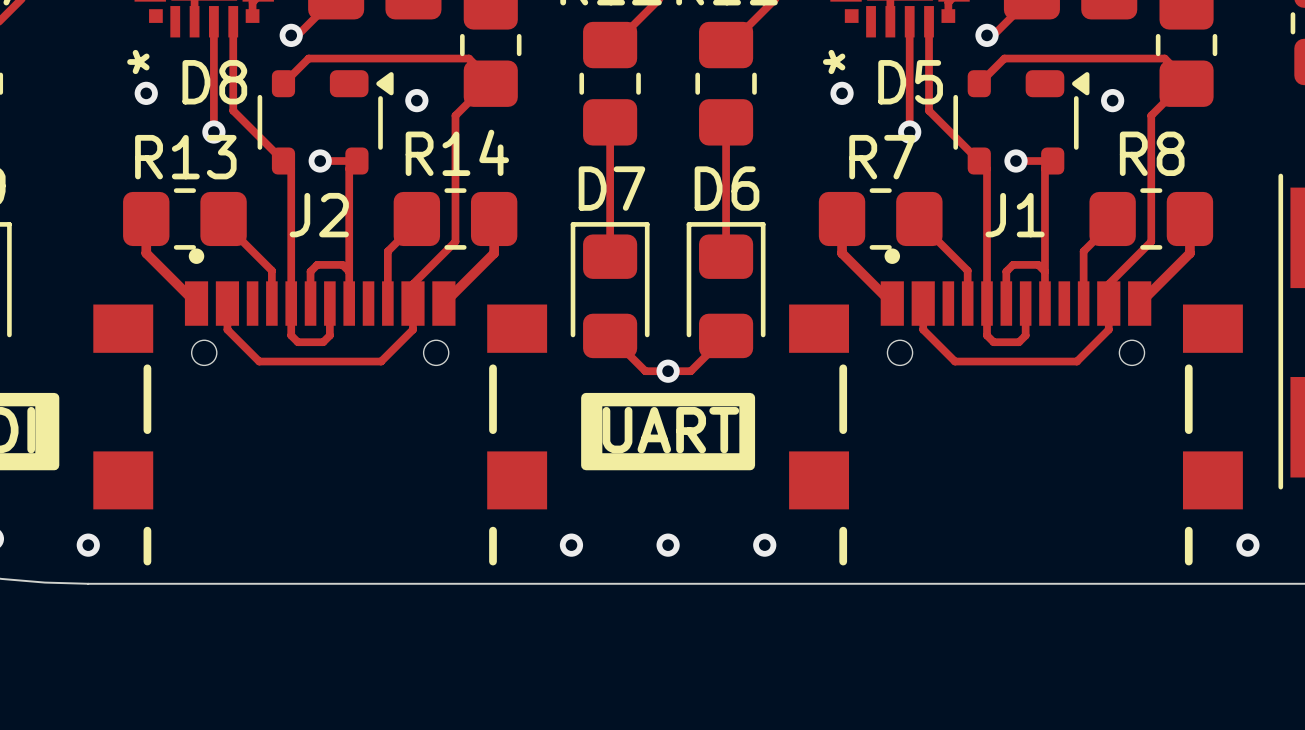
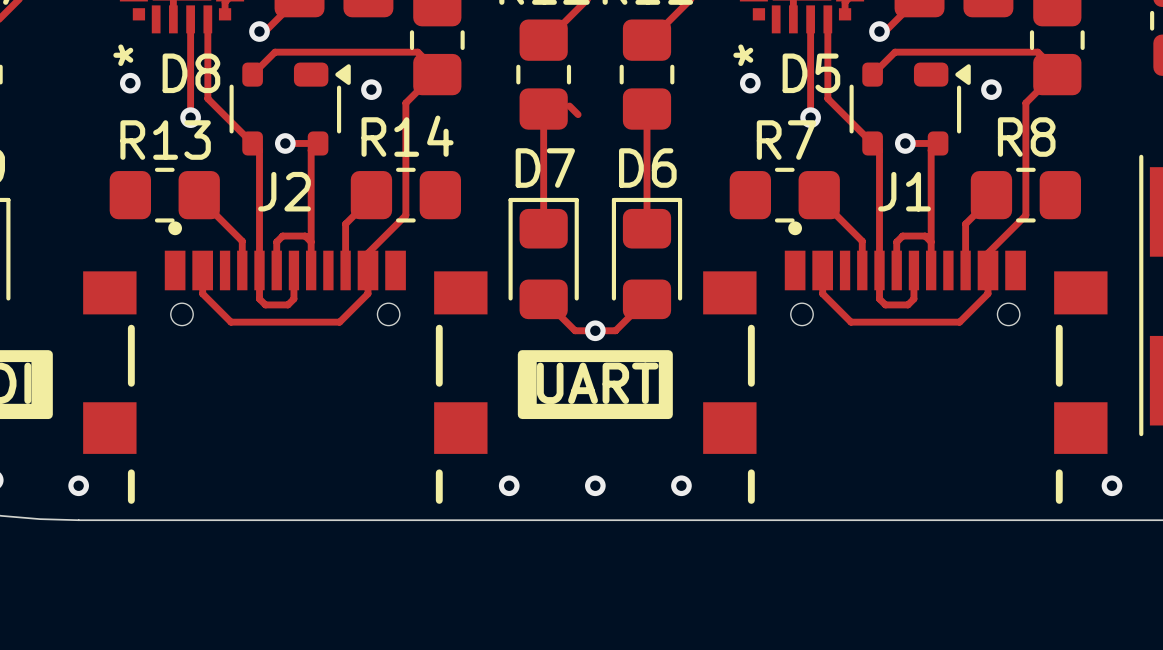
track: none -> (569, 106) (578, 114)
track: (146, 218) (146, 253) (196, 303) -> none
track: (494, 218) (494, 253) (443, 303) -> none
track: (842, 218) (842, 253) (892, 303) -> none
track: (1189, 218) (1189, 253) (1139, 303) -> none

